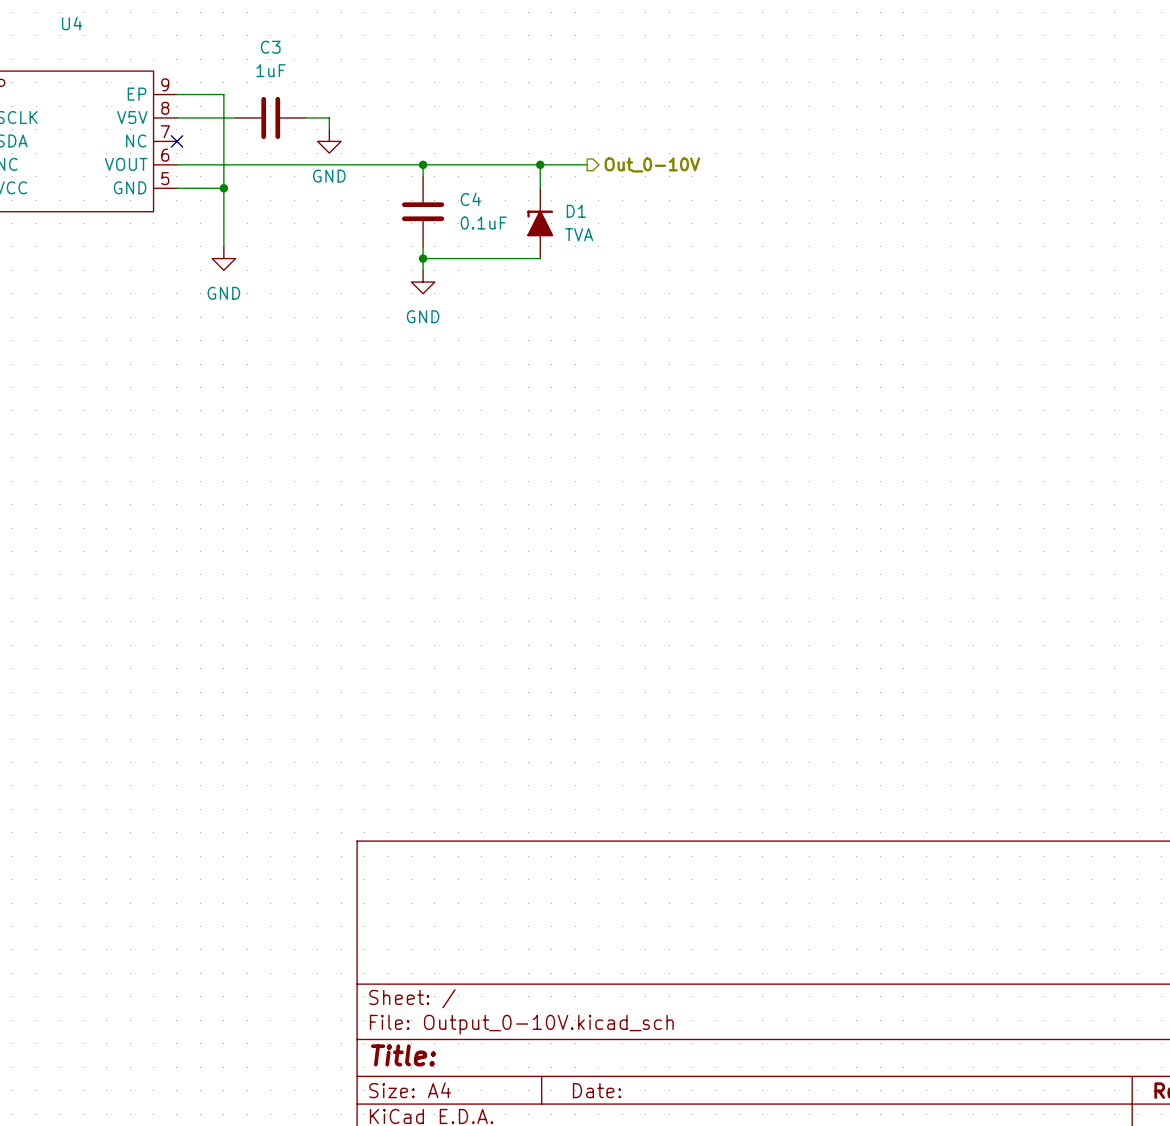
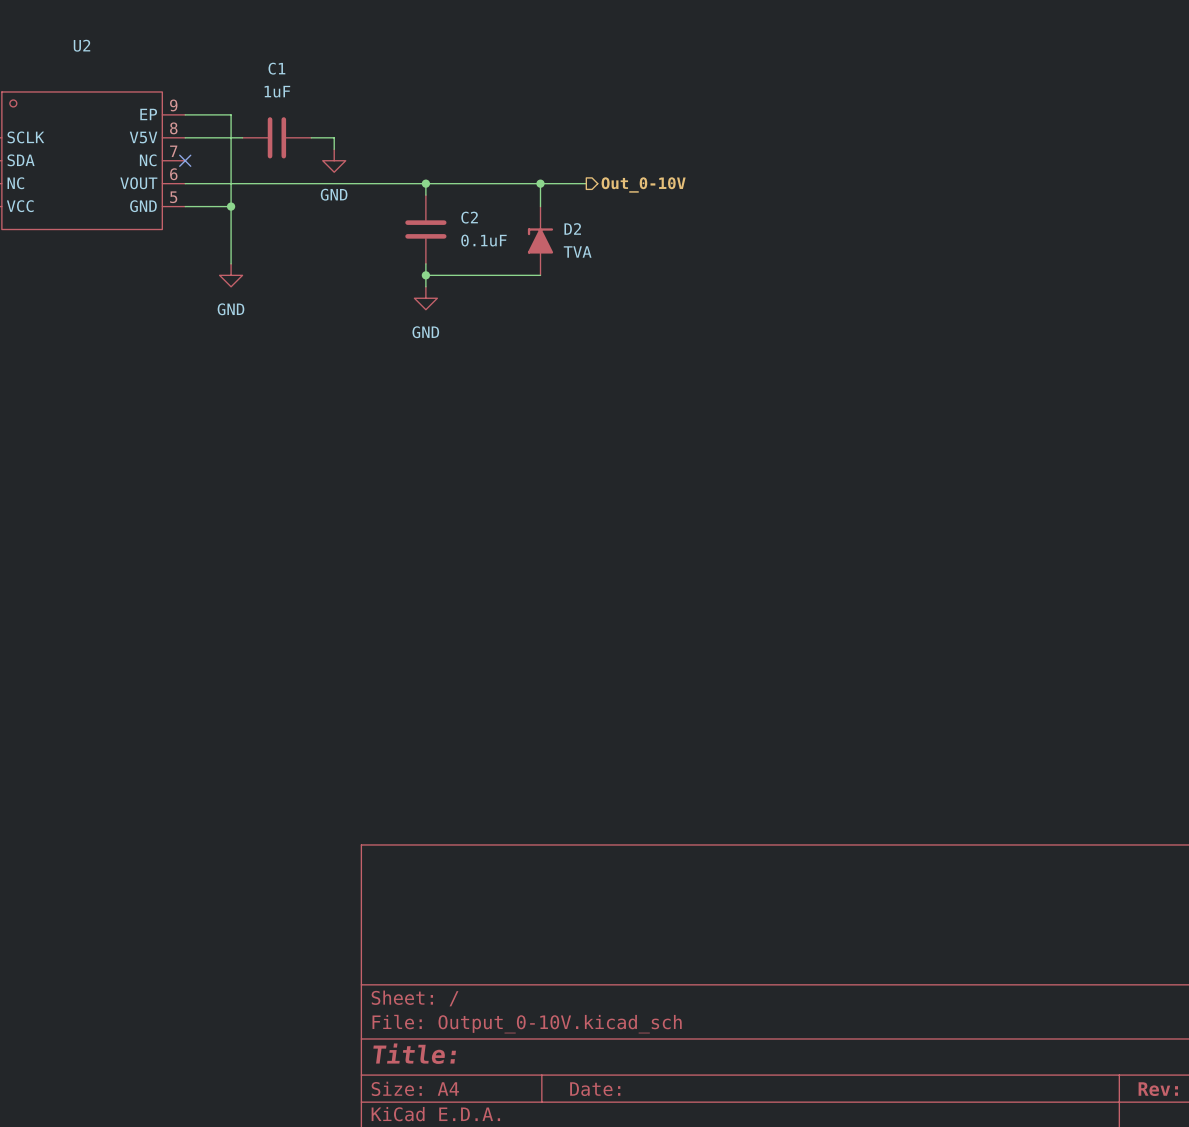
U4 name: U4 (72, 23) -> U2 (82, 45)
C3 name: C3 (270, 47) -> C1 (276, 68)
C4 name: C4 (470, 199) -> C2 (469, 217)
D1 name: D1 (576, 211) -> D2 (572, 228)

